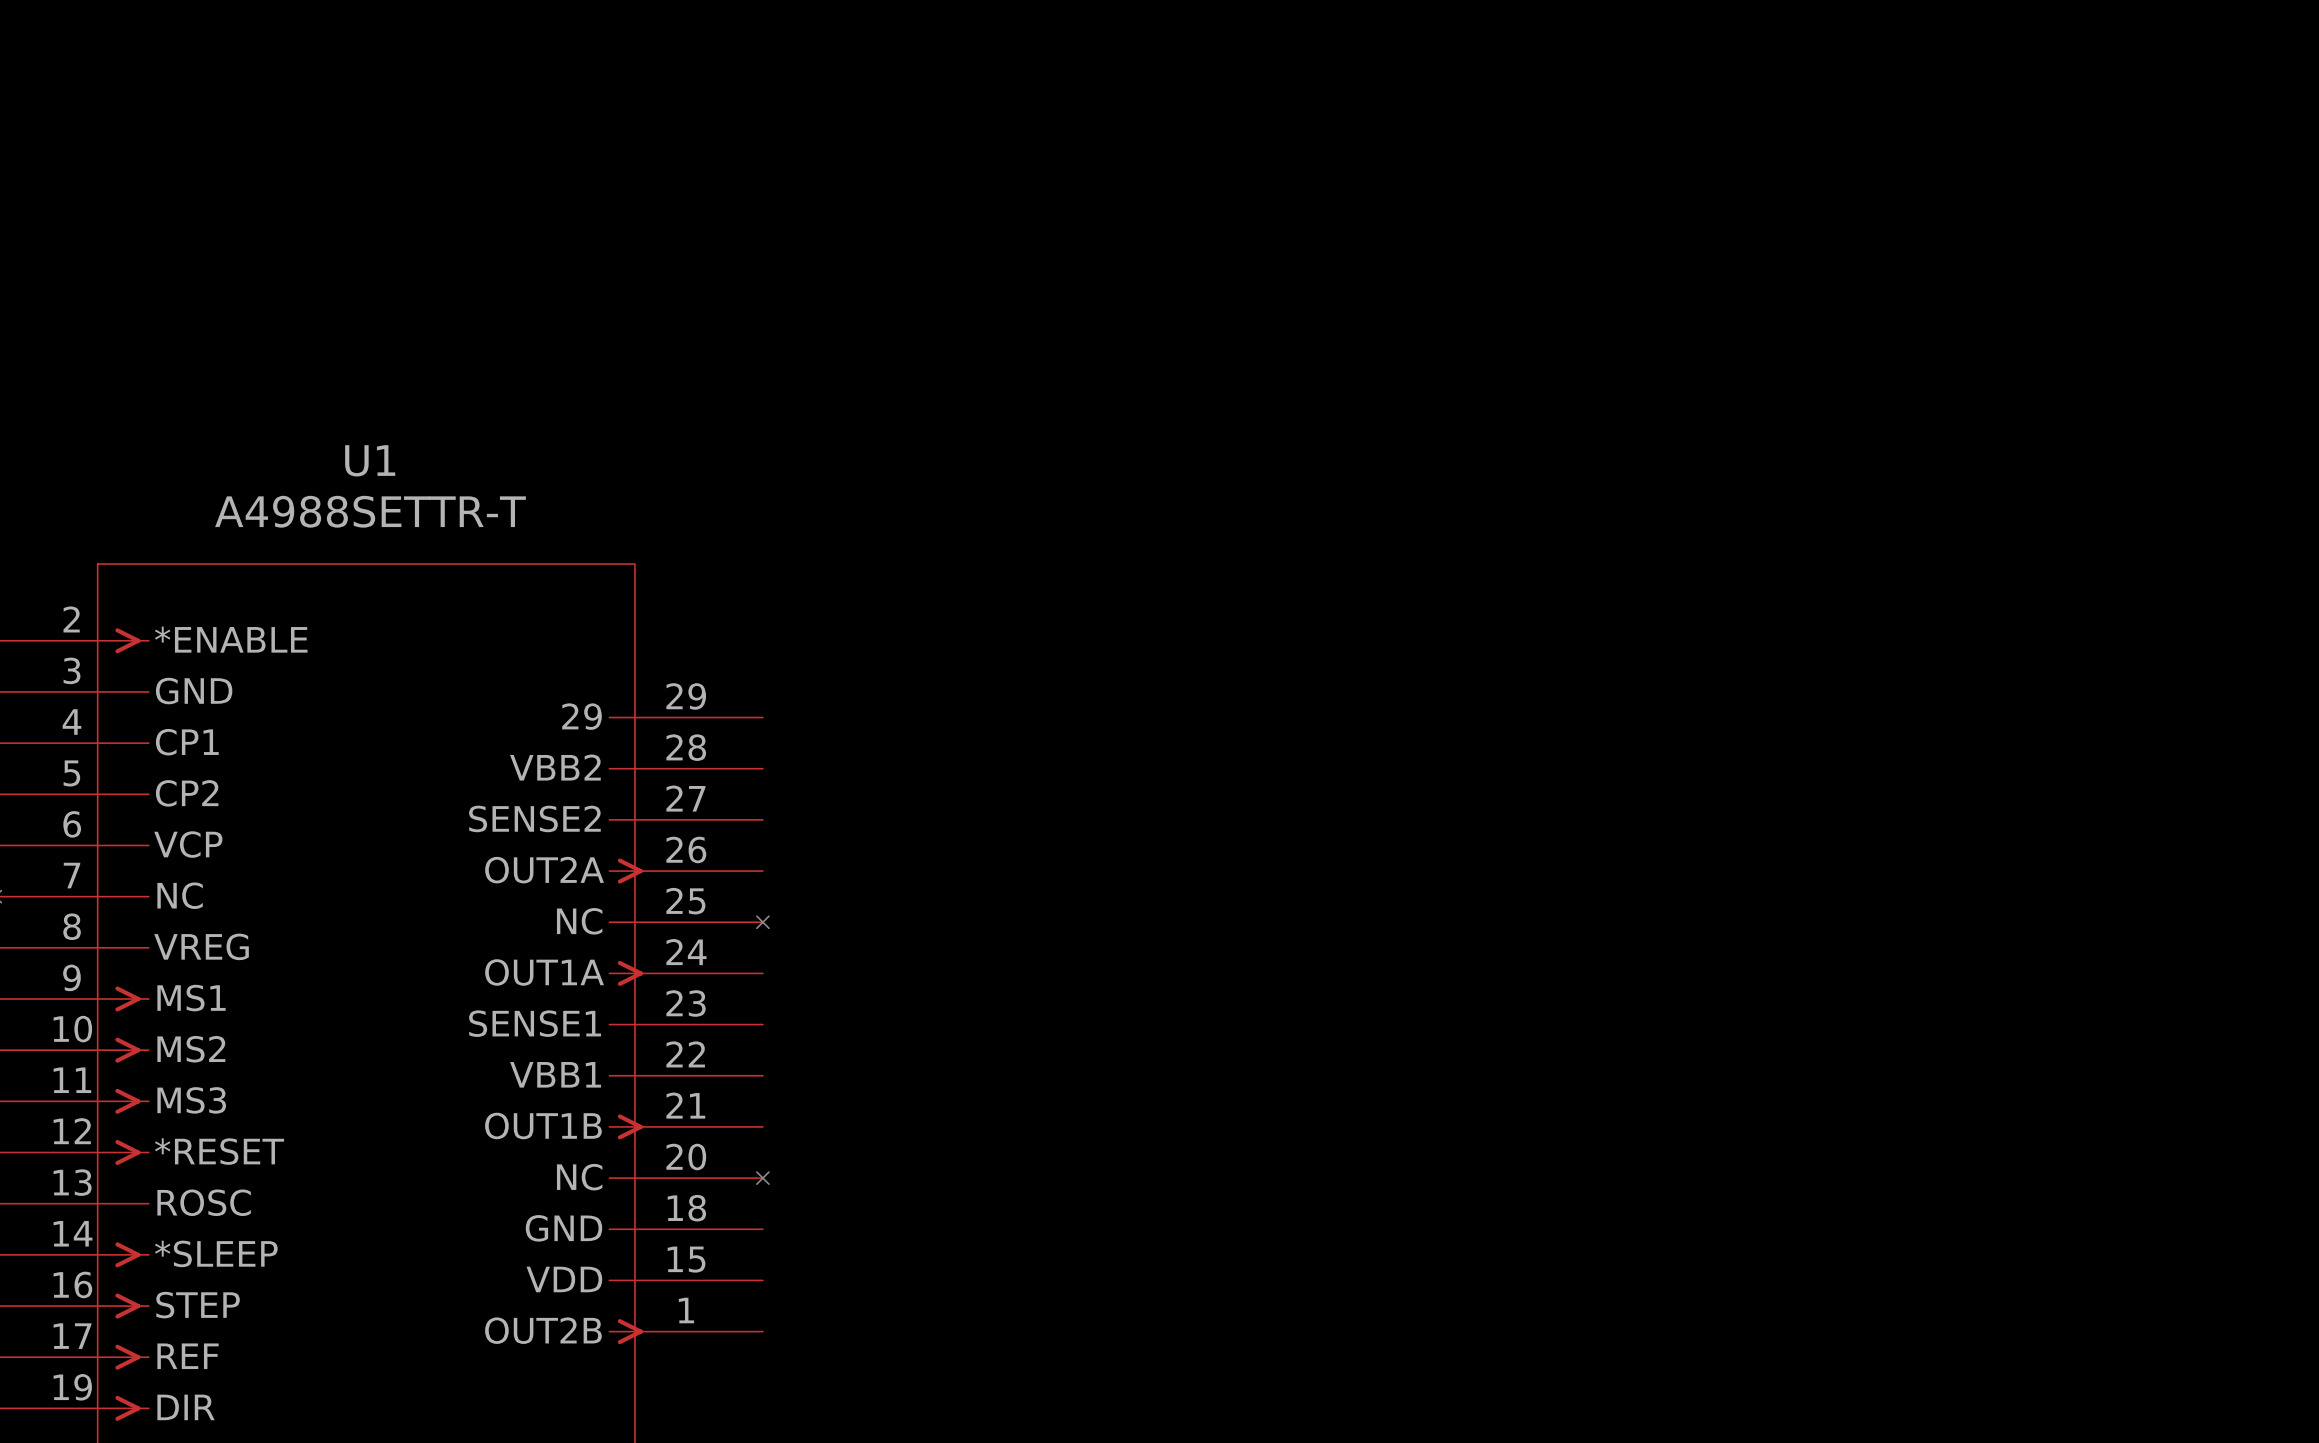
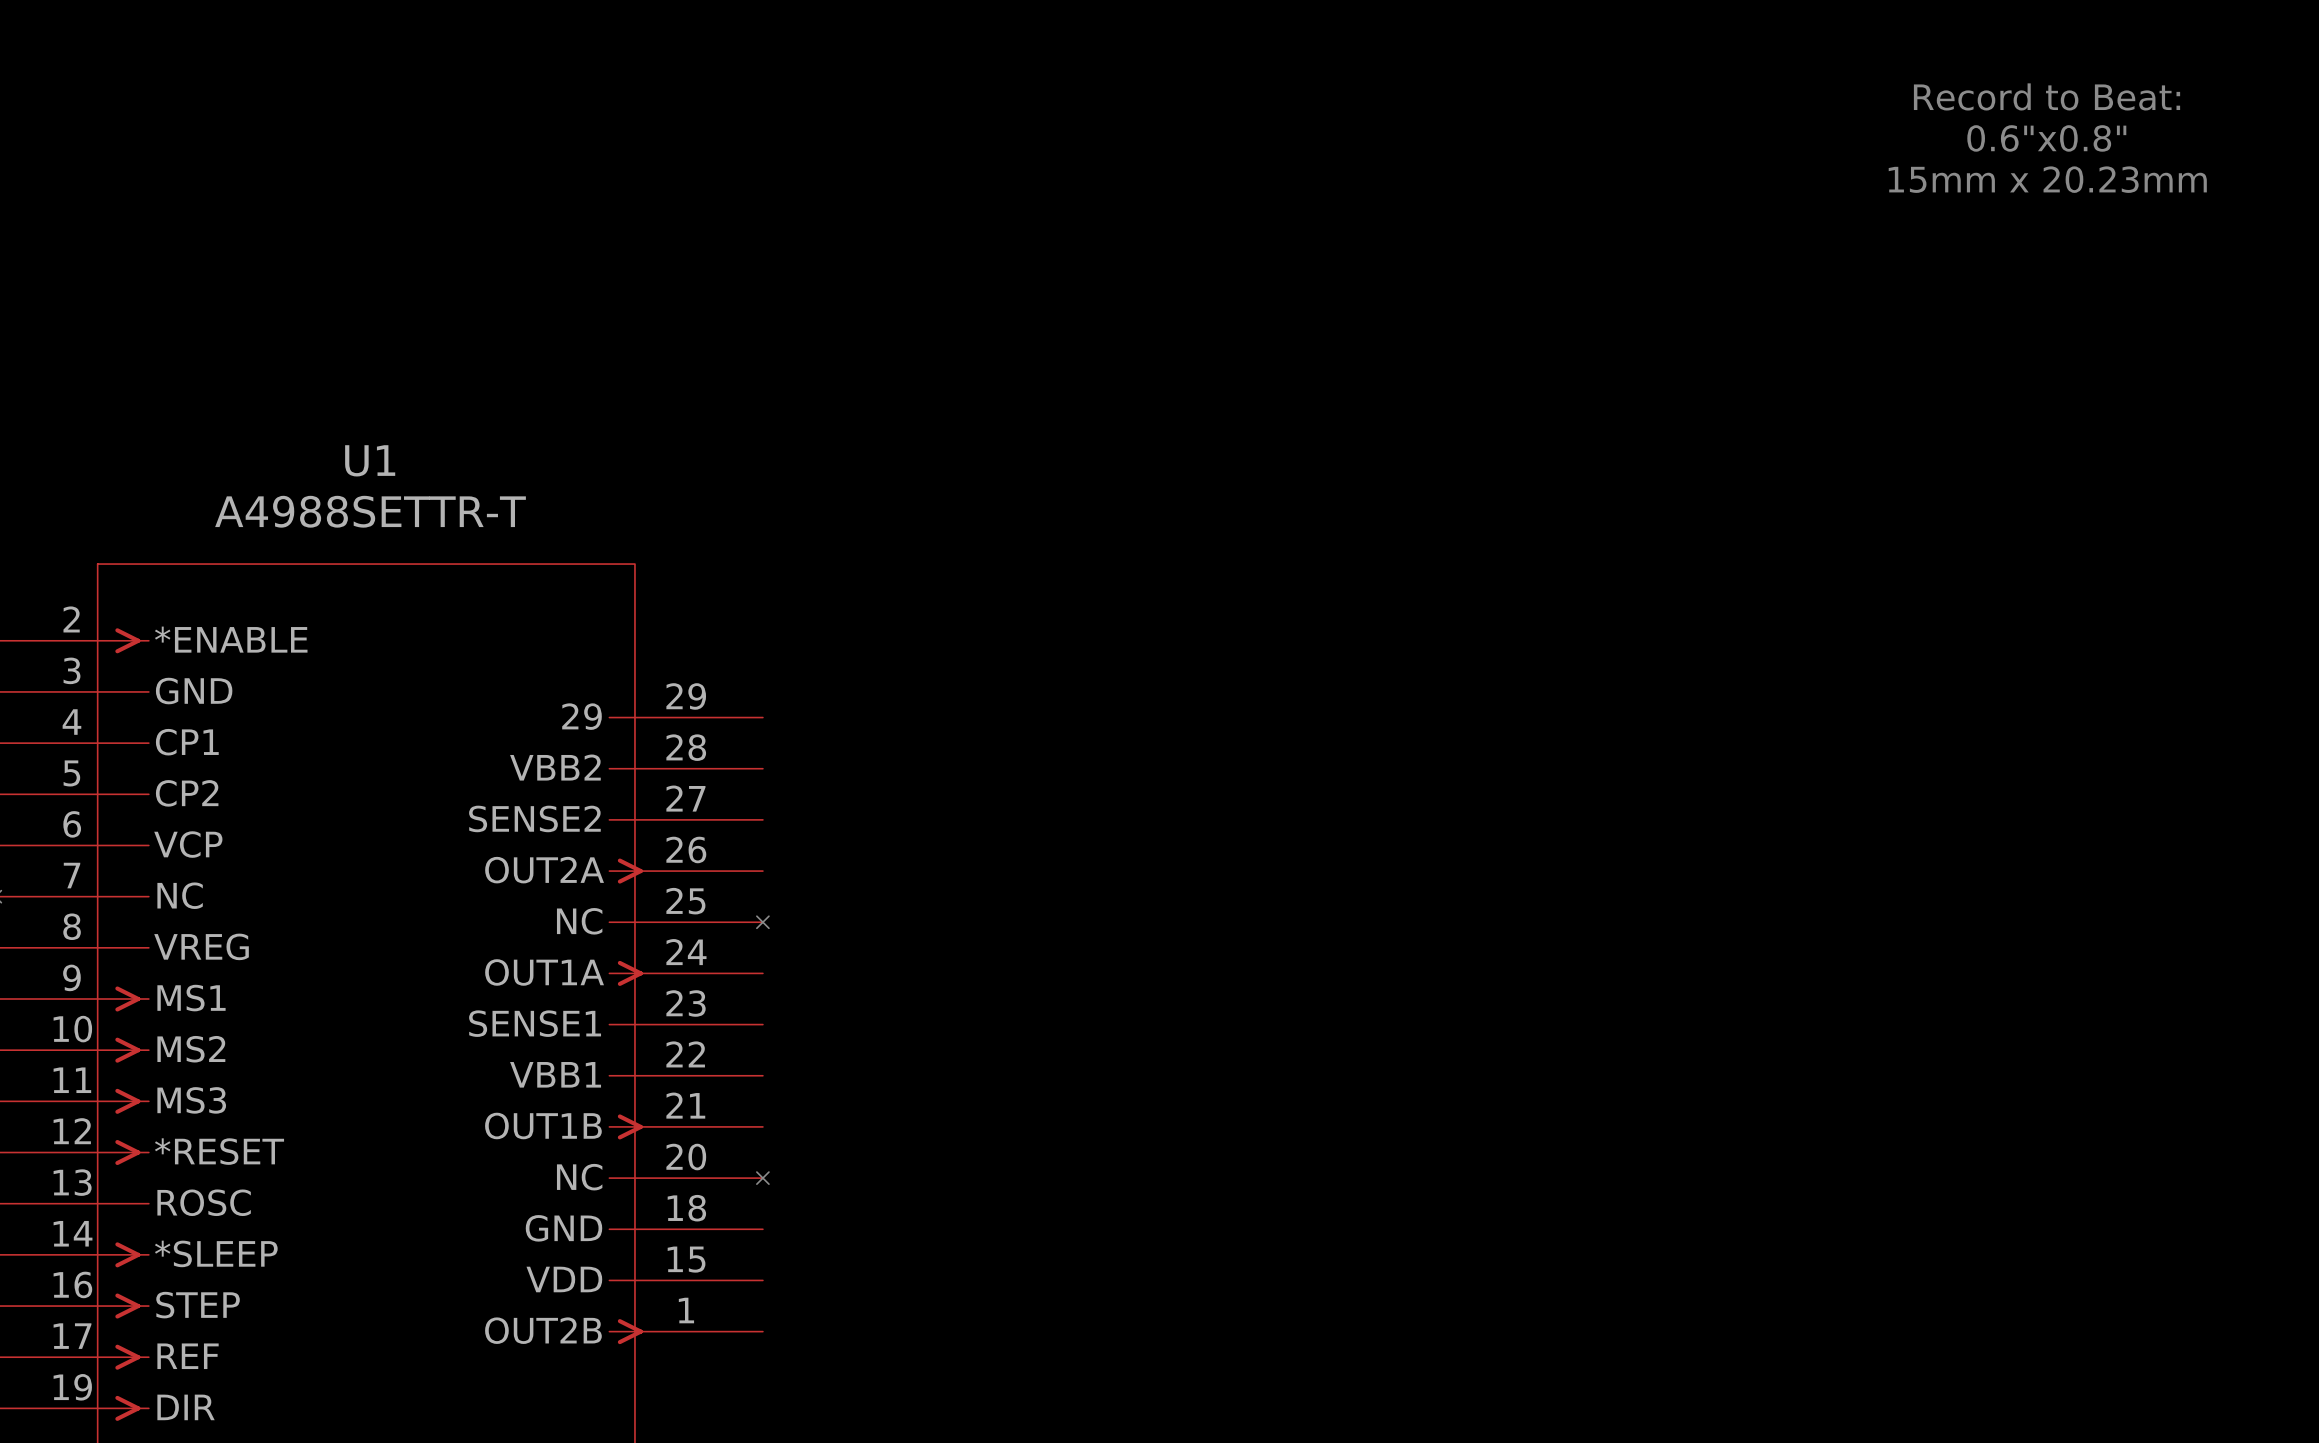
text: none -> Record to Beat: (2047, 96)
text: none -> 0.6"x0.8" (2046, 138)
text: none -> 15mm x 20.23mm (2047, 179)

